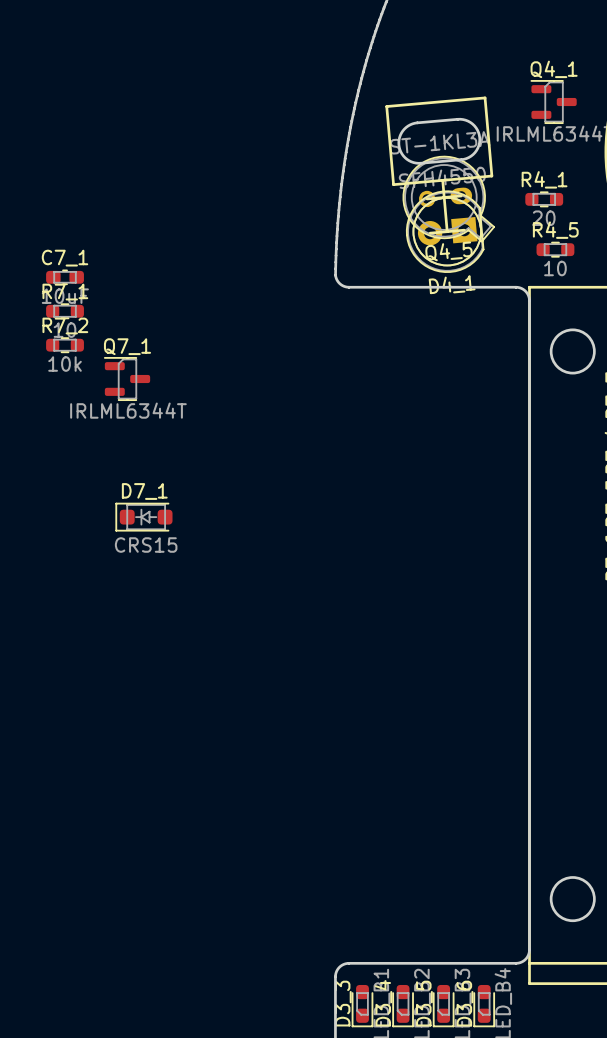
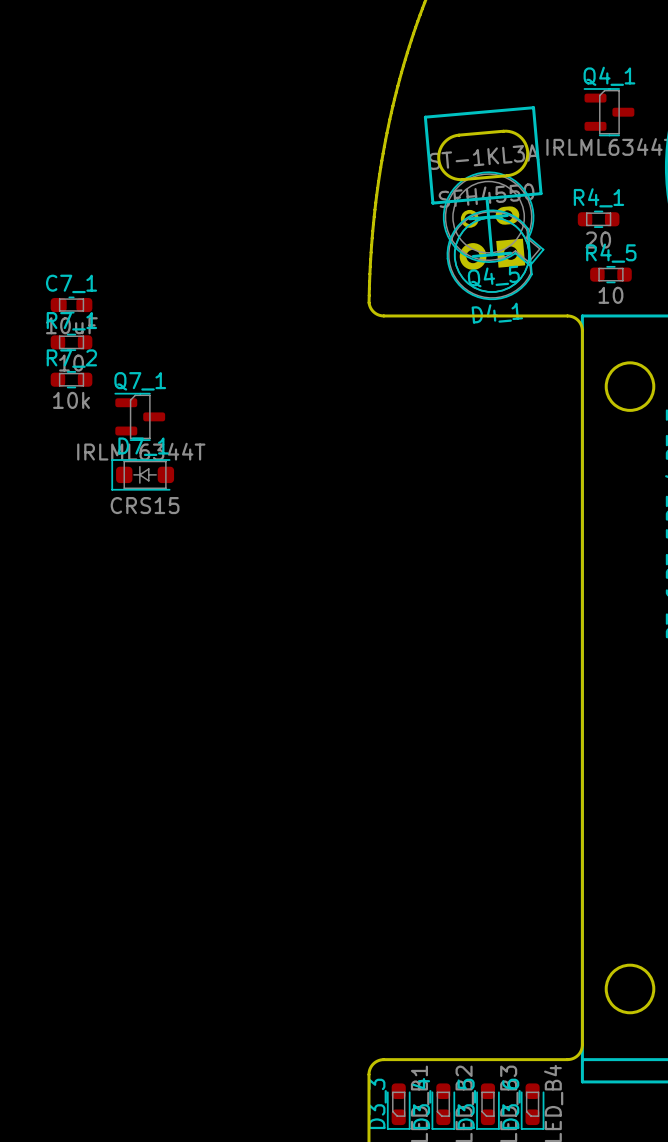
D7_1 position: (143, 517) -> (142, 474)

